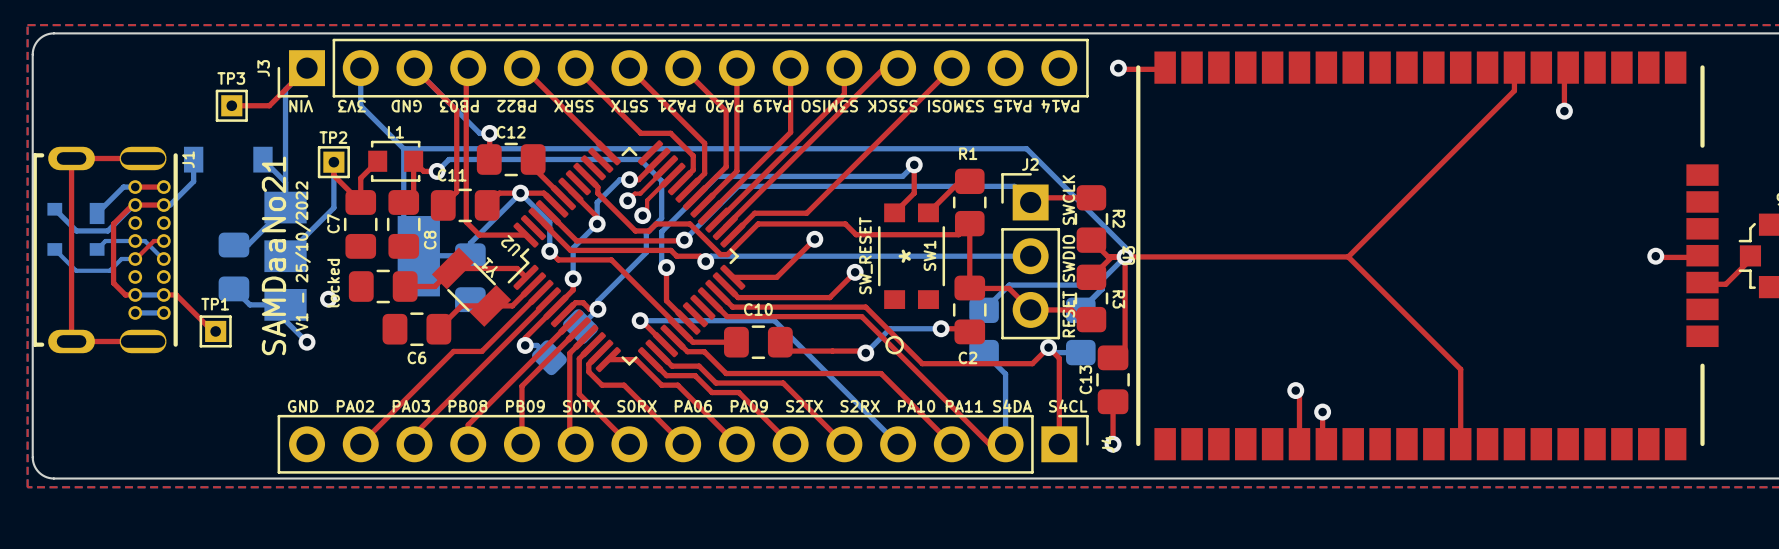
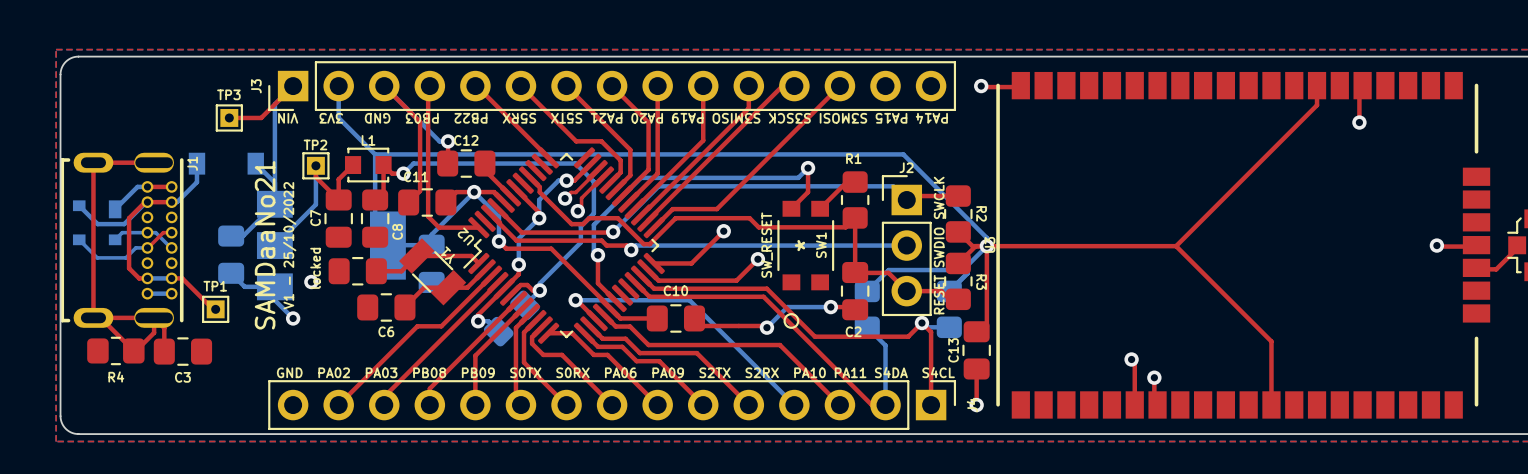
top track: none -> (100, 317) (133, 350) (154, 332) (154, 317) (164, 328) (164, 351)
R4: none -> (115, 350)
C3: none -> (182, 351)

